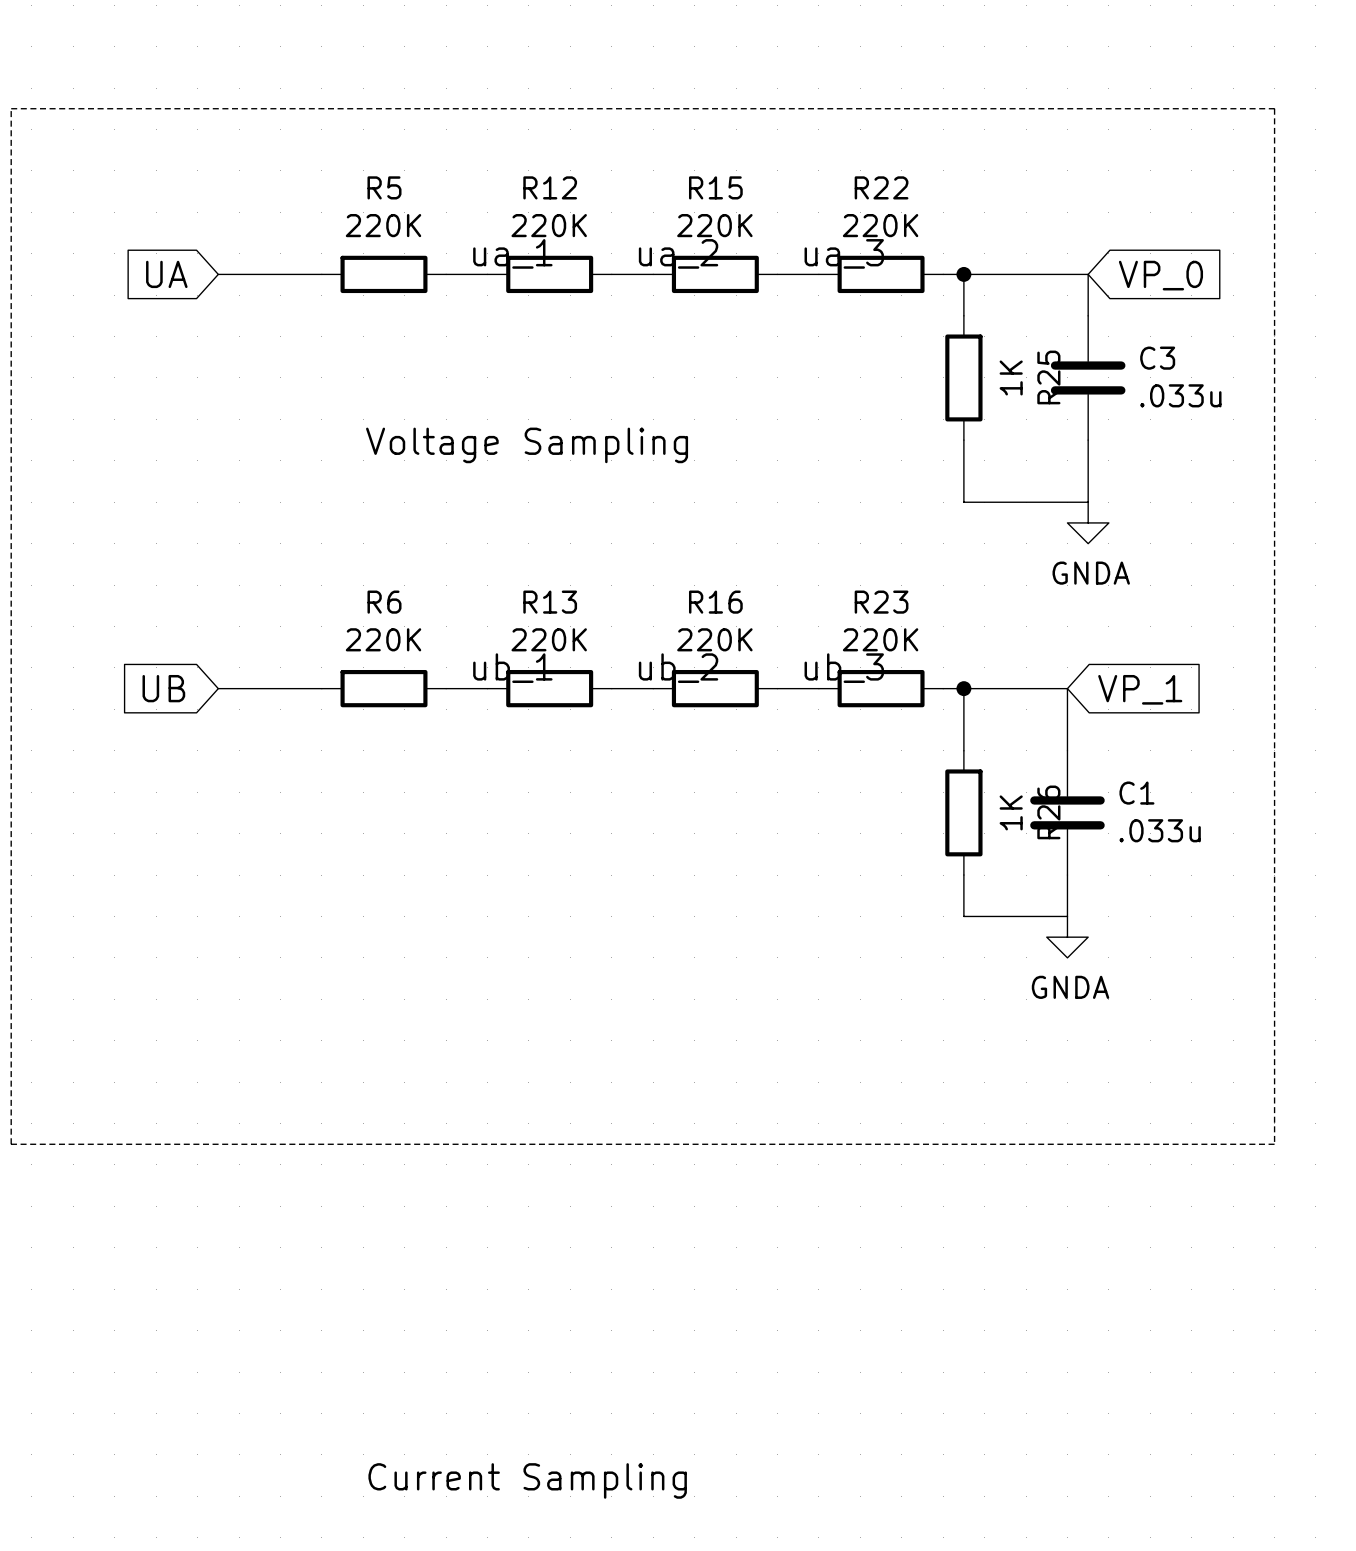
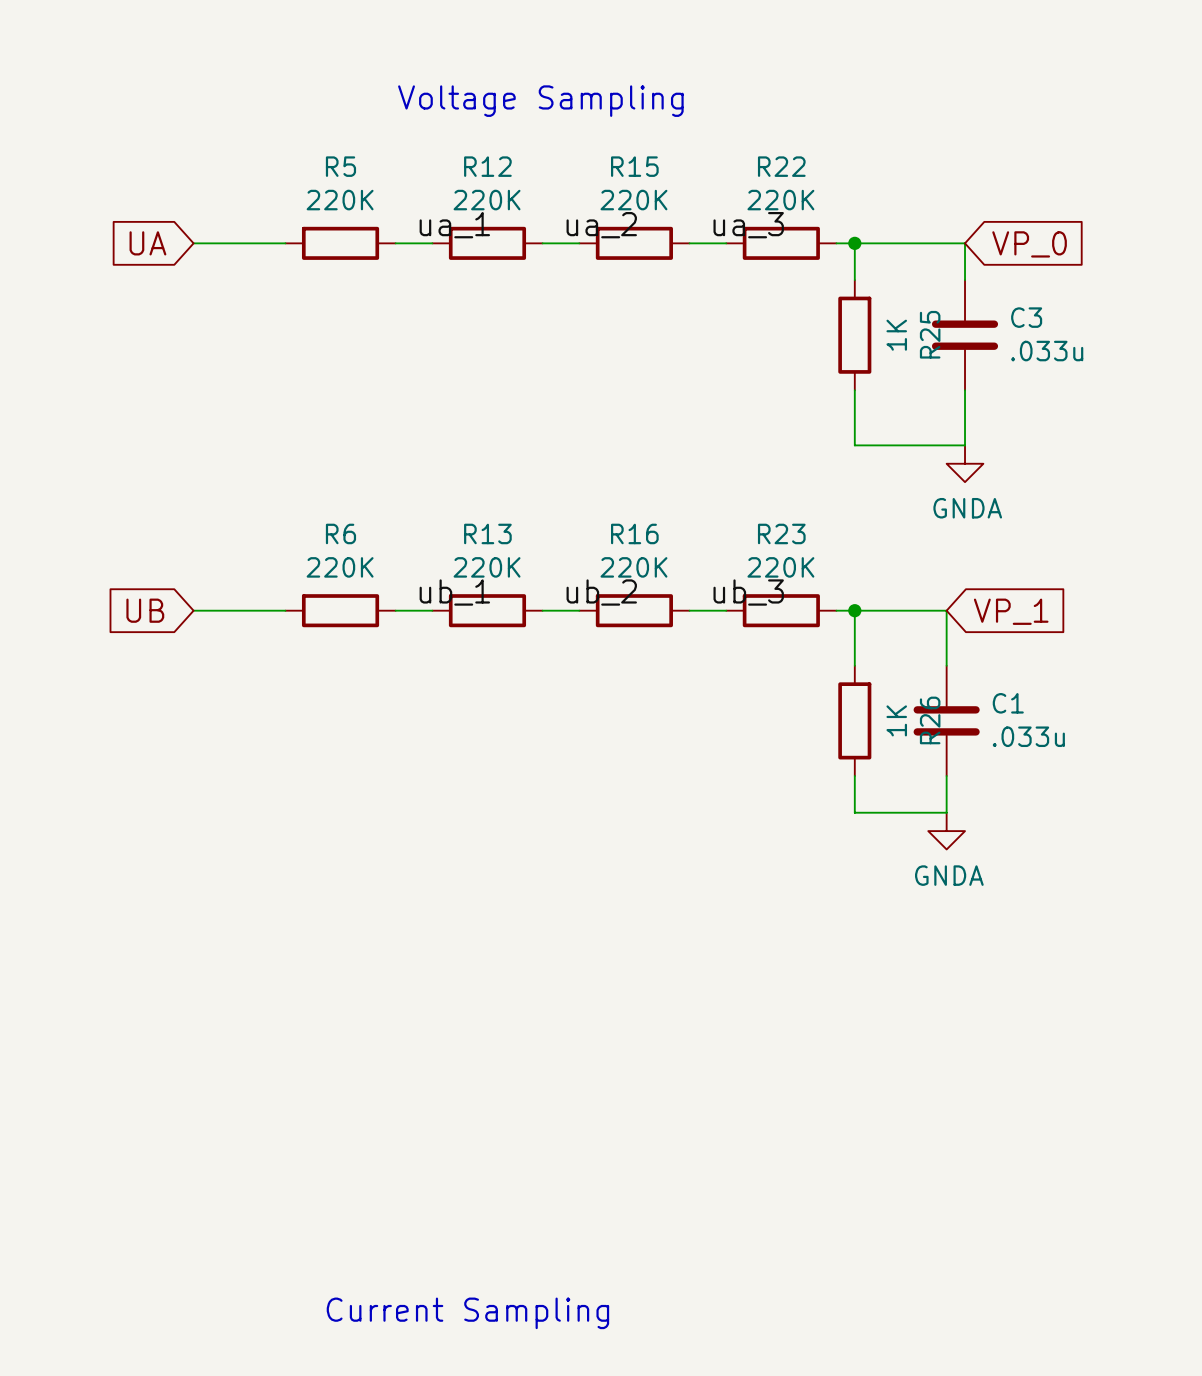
line: (11, 108) (1274, 108) (1274, 1144) (11, 1144) (11, 108) -> none
text position: Voltage Sampling (527, 445) -> Voltage Sampling (540, 101)

